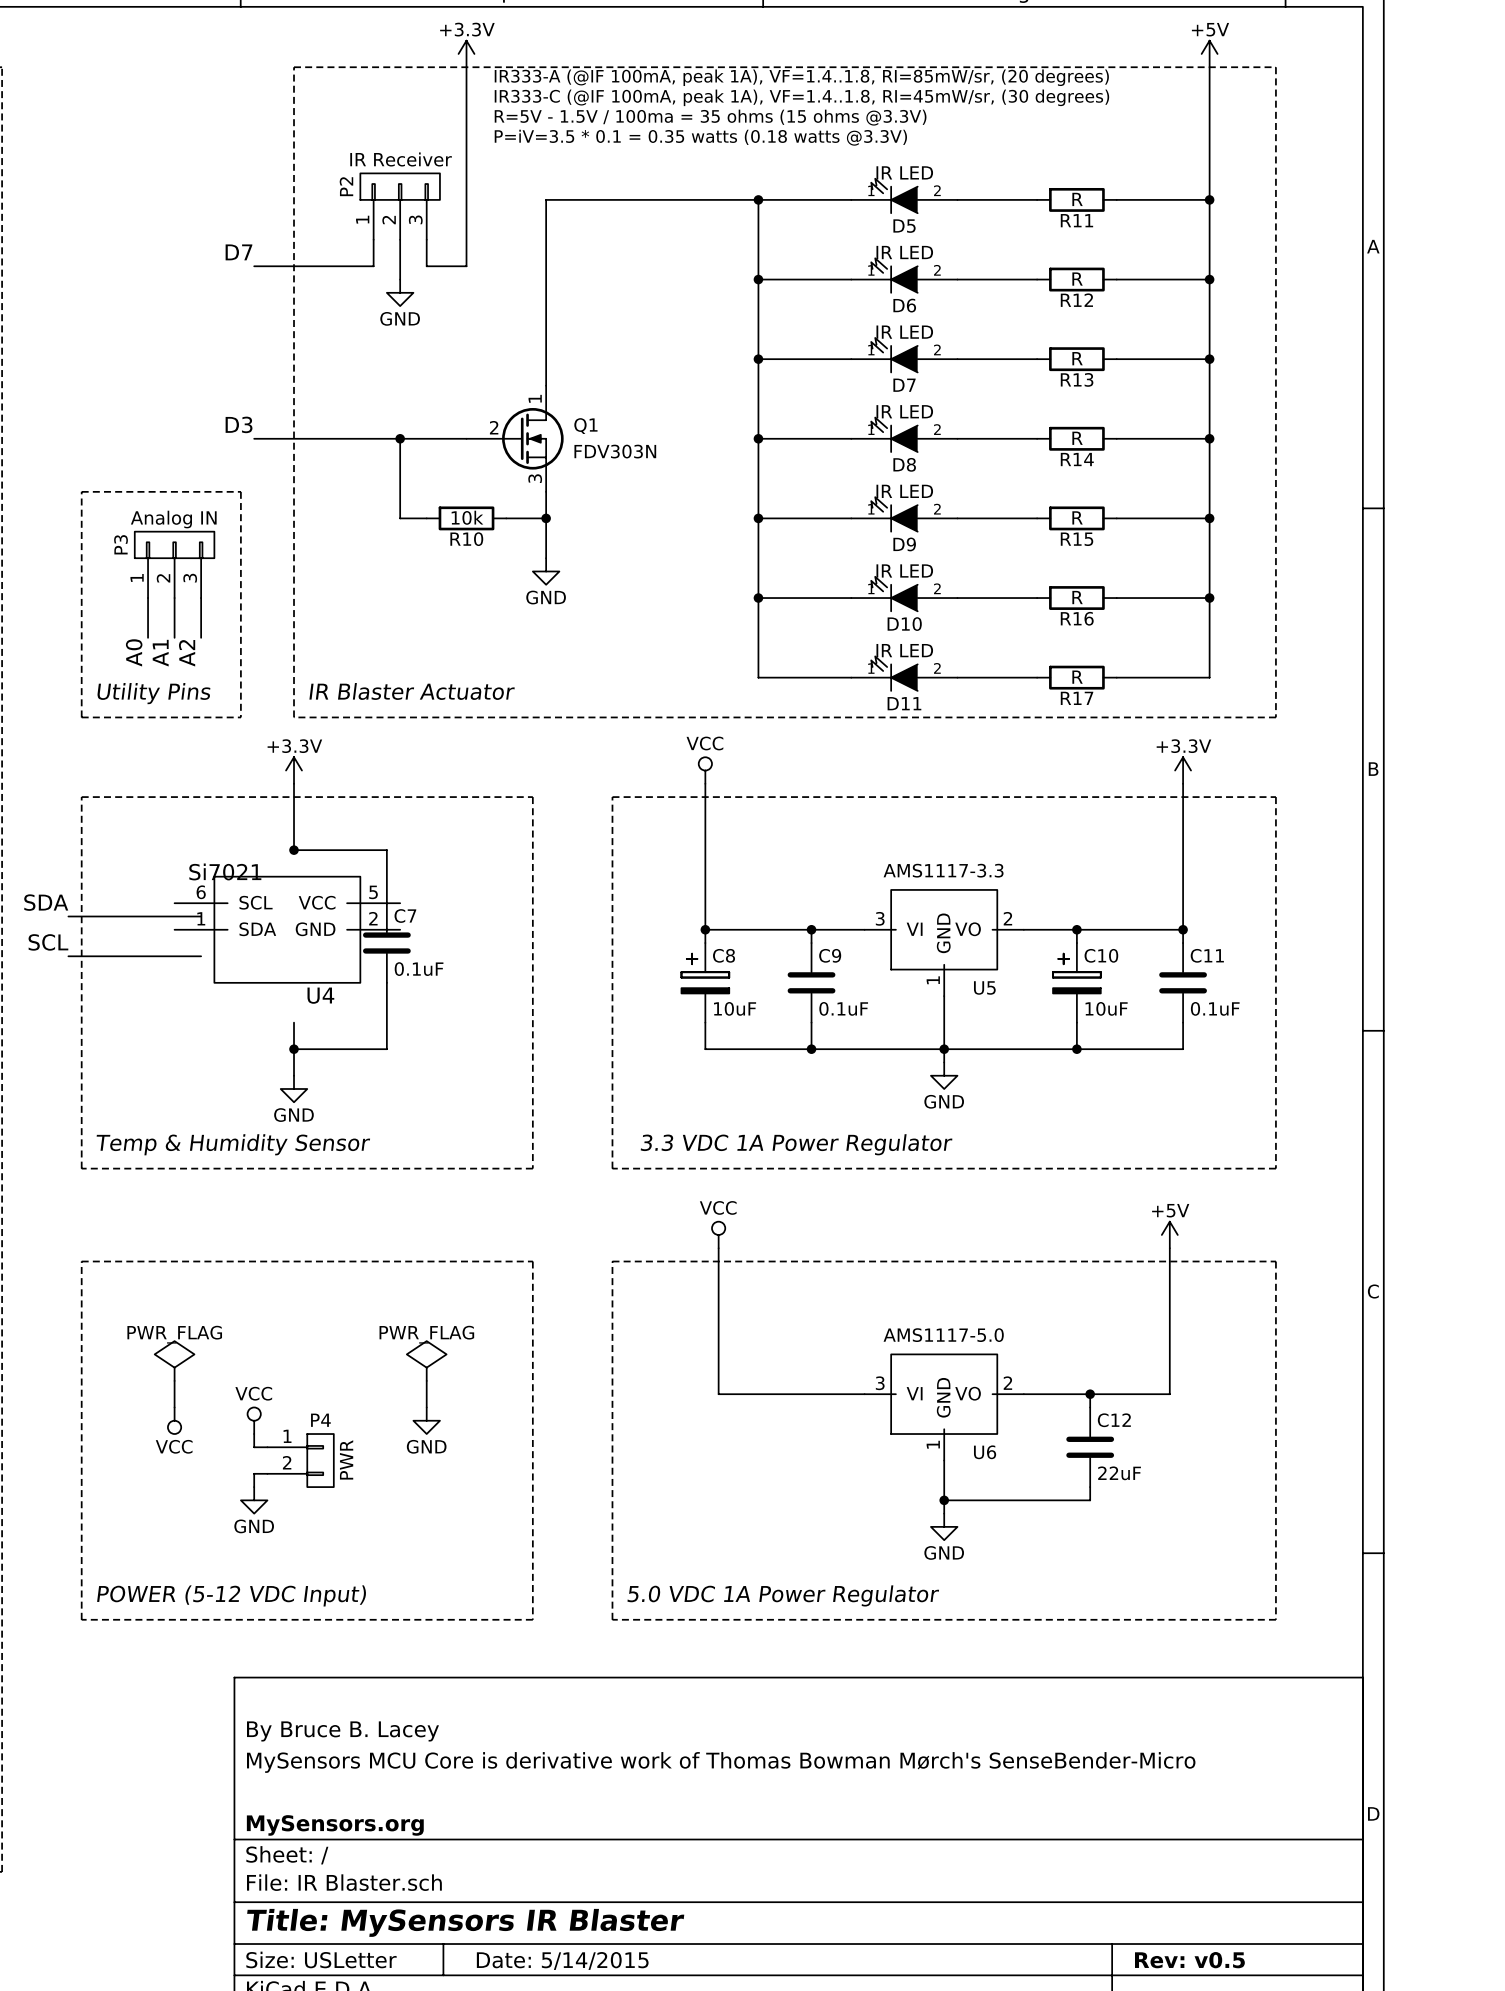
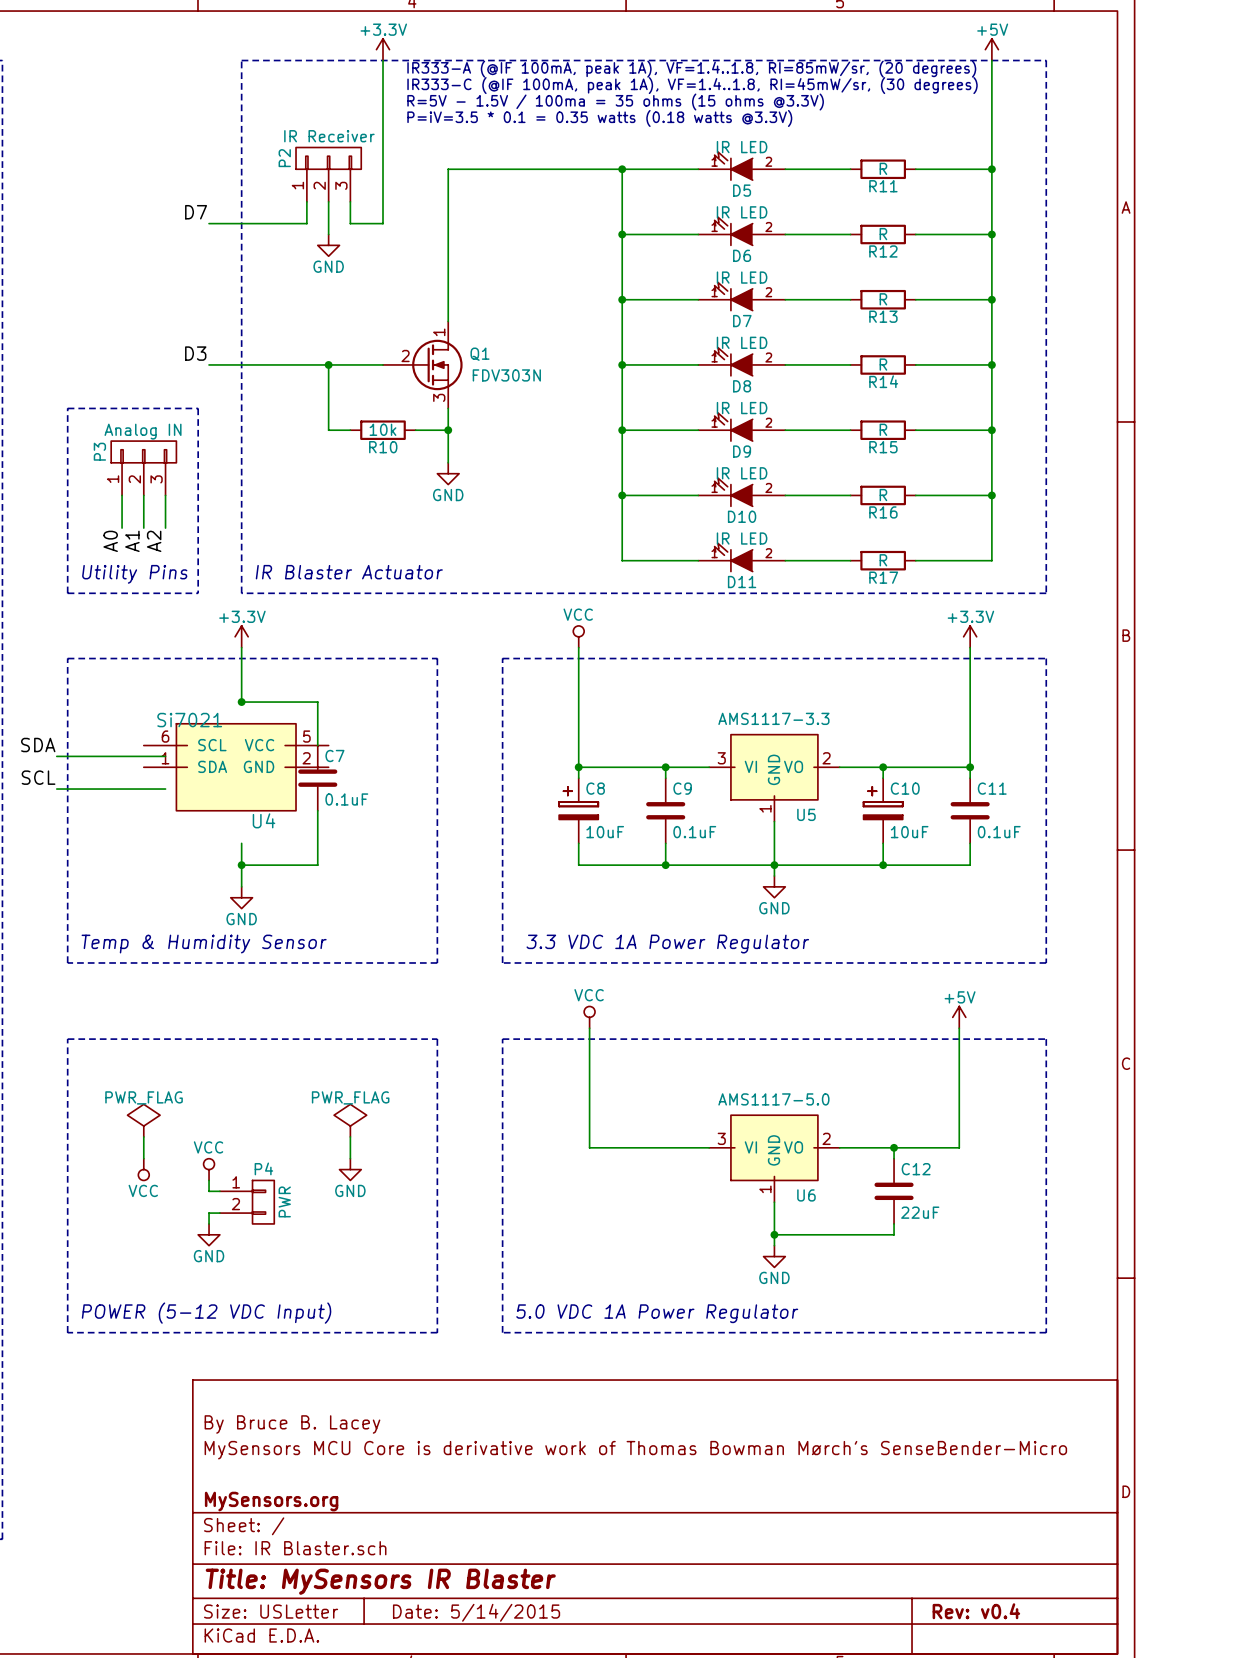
title block: Rev: v0.5 (1189, 1960) -> Rev: v0.4 (976, 1611)

